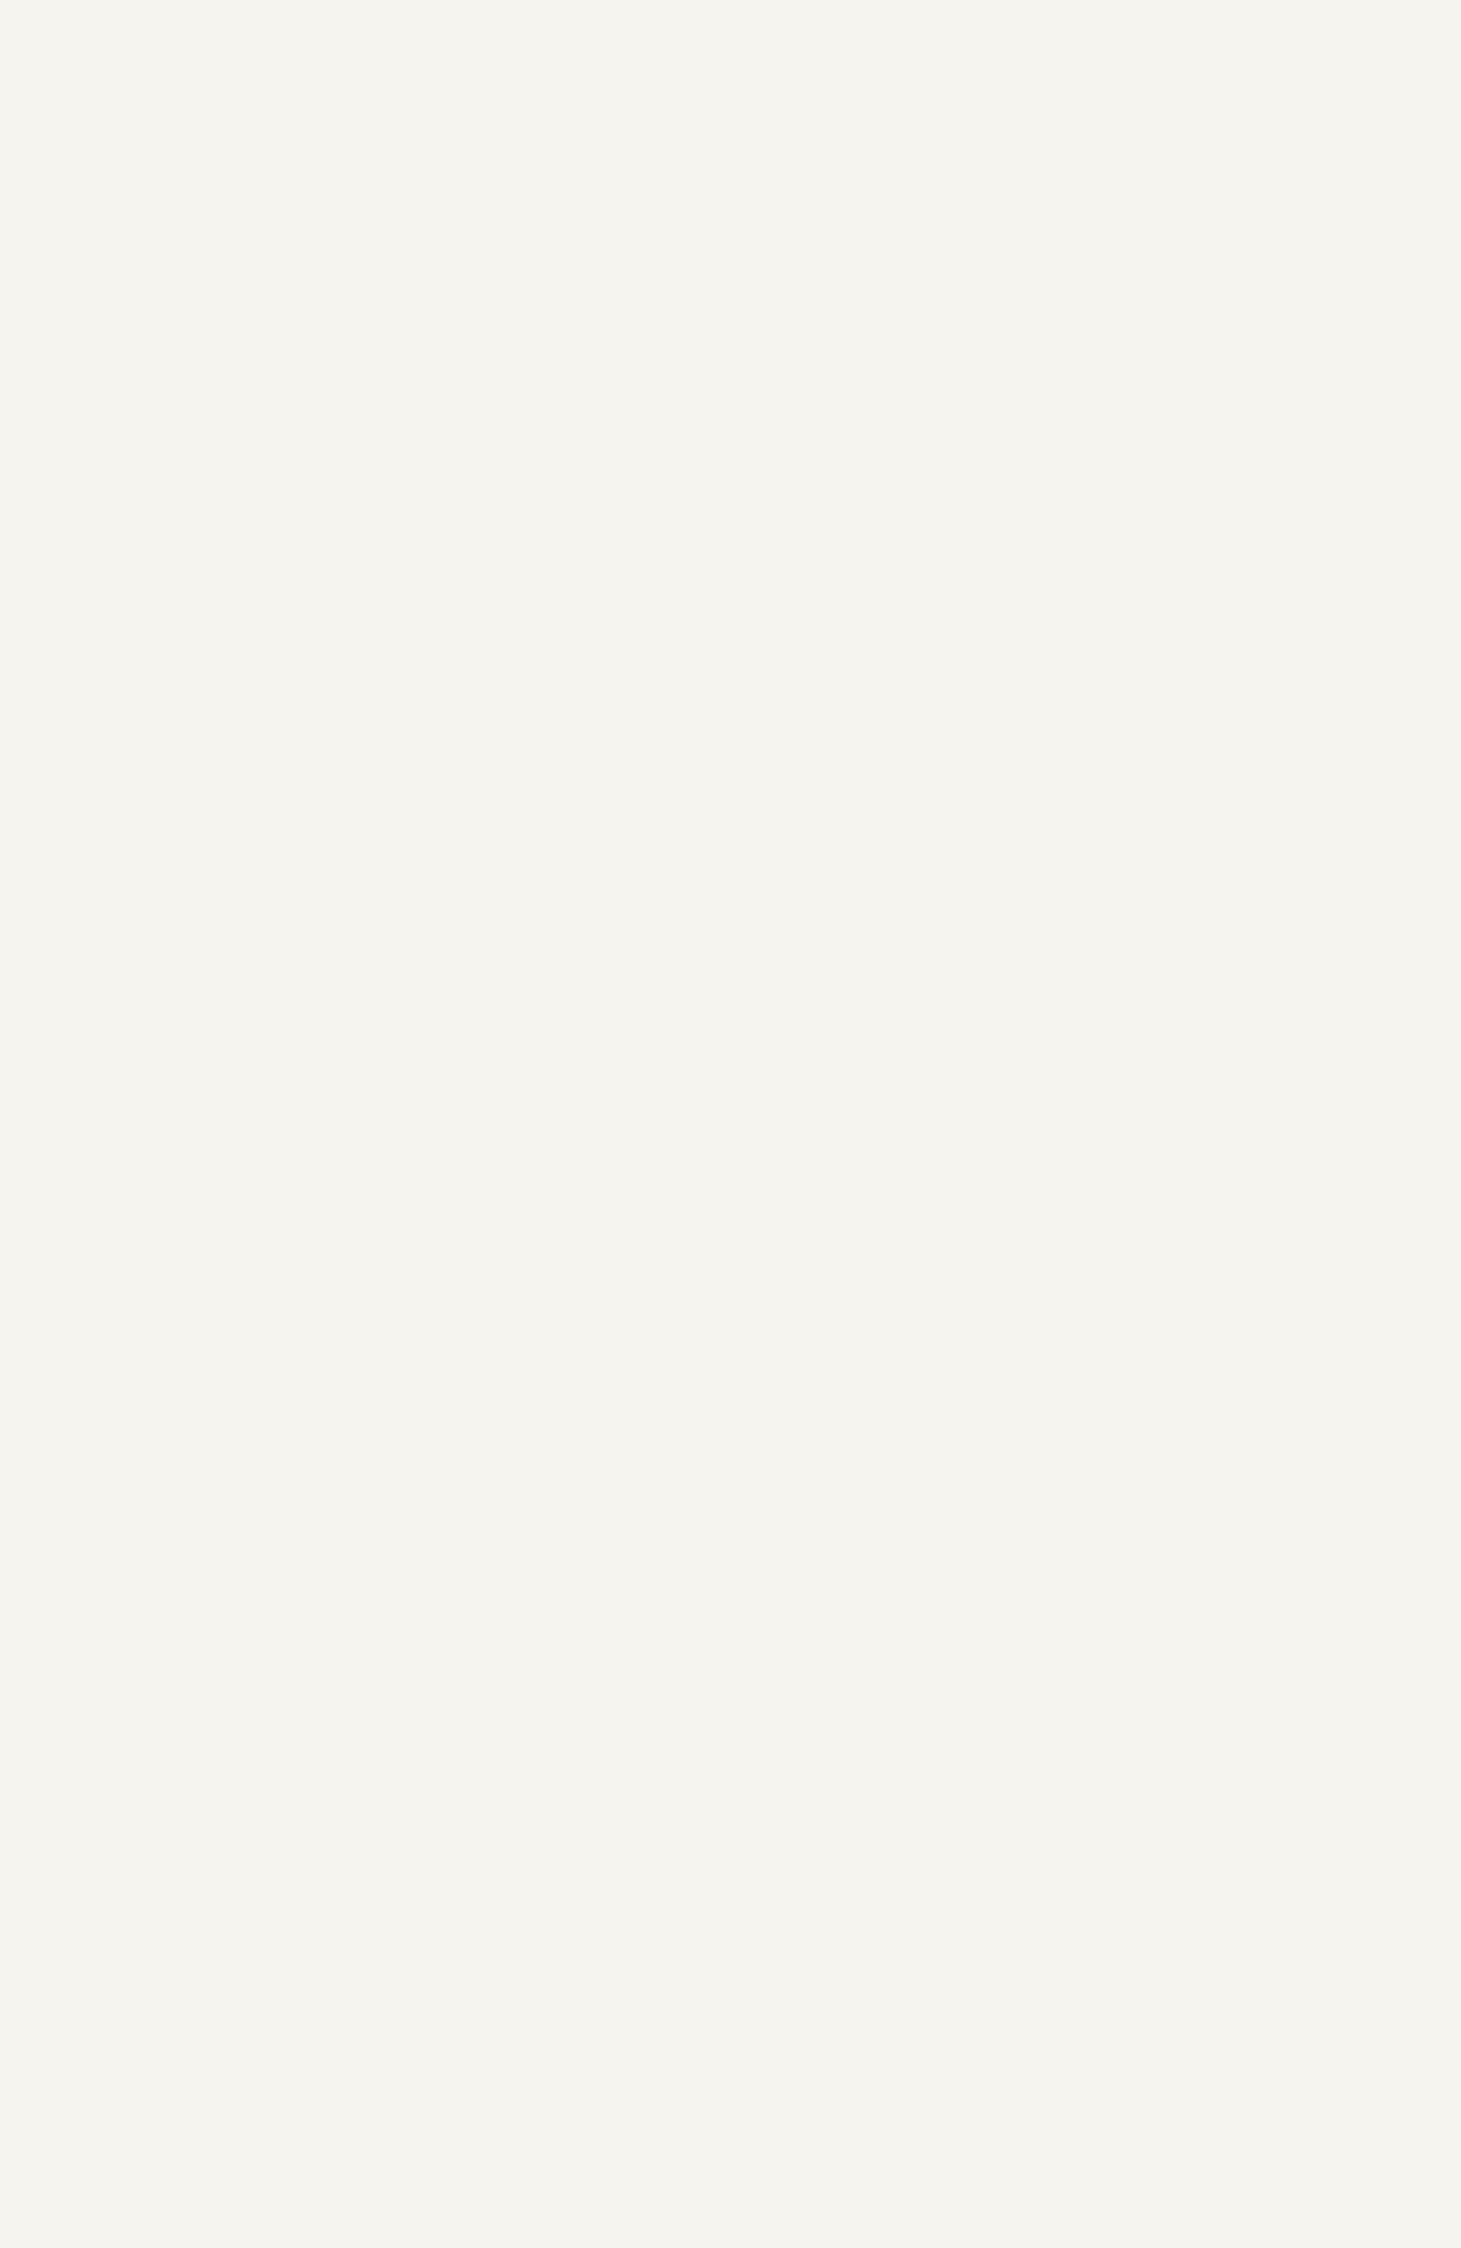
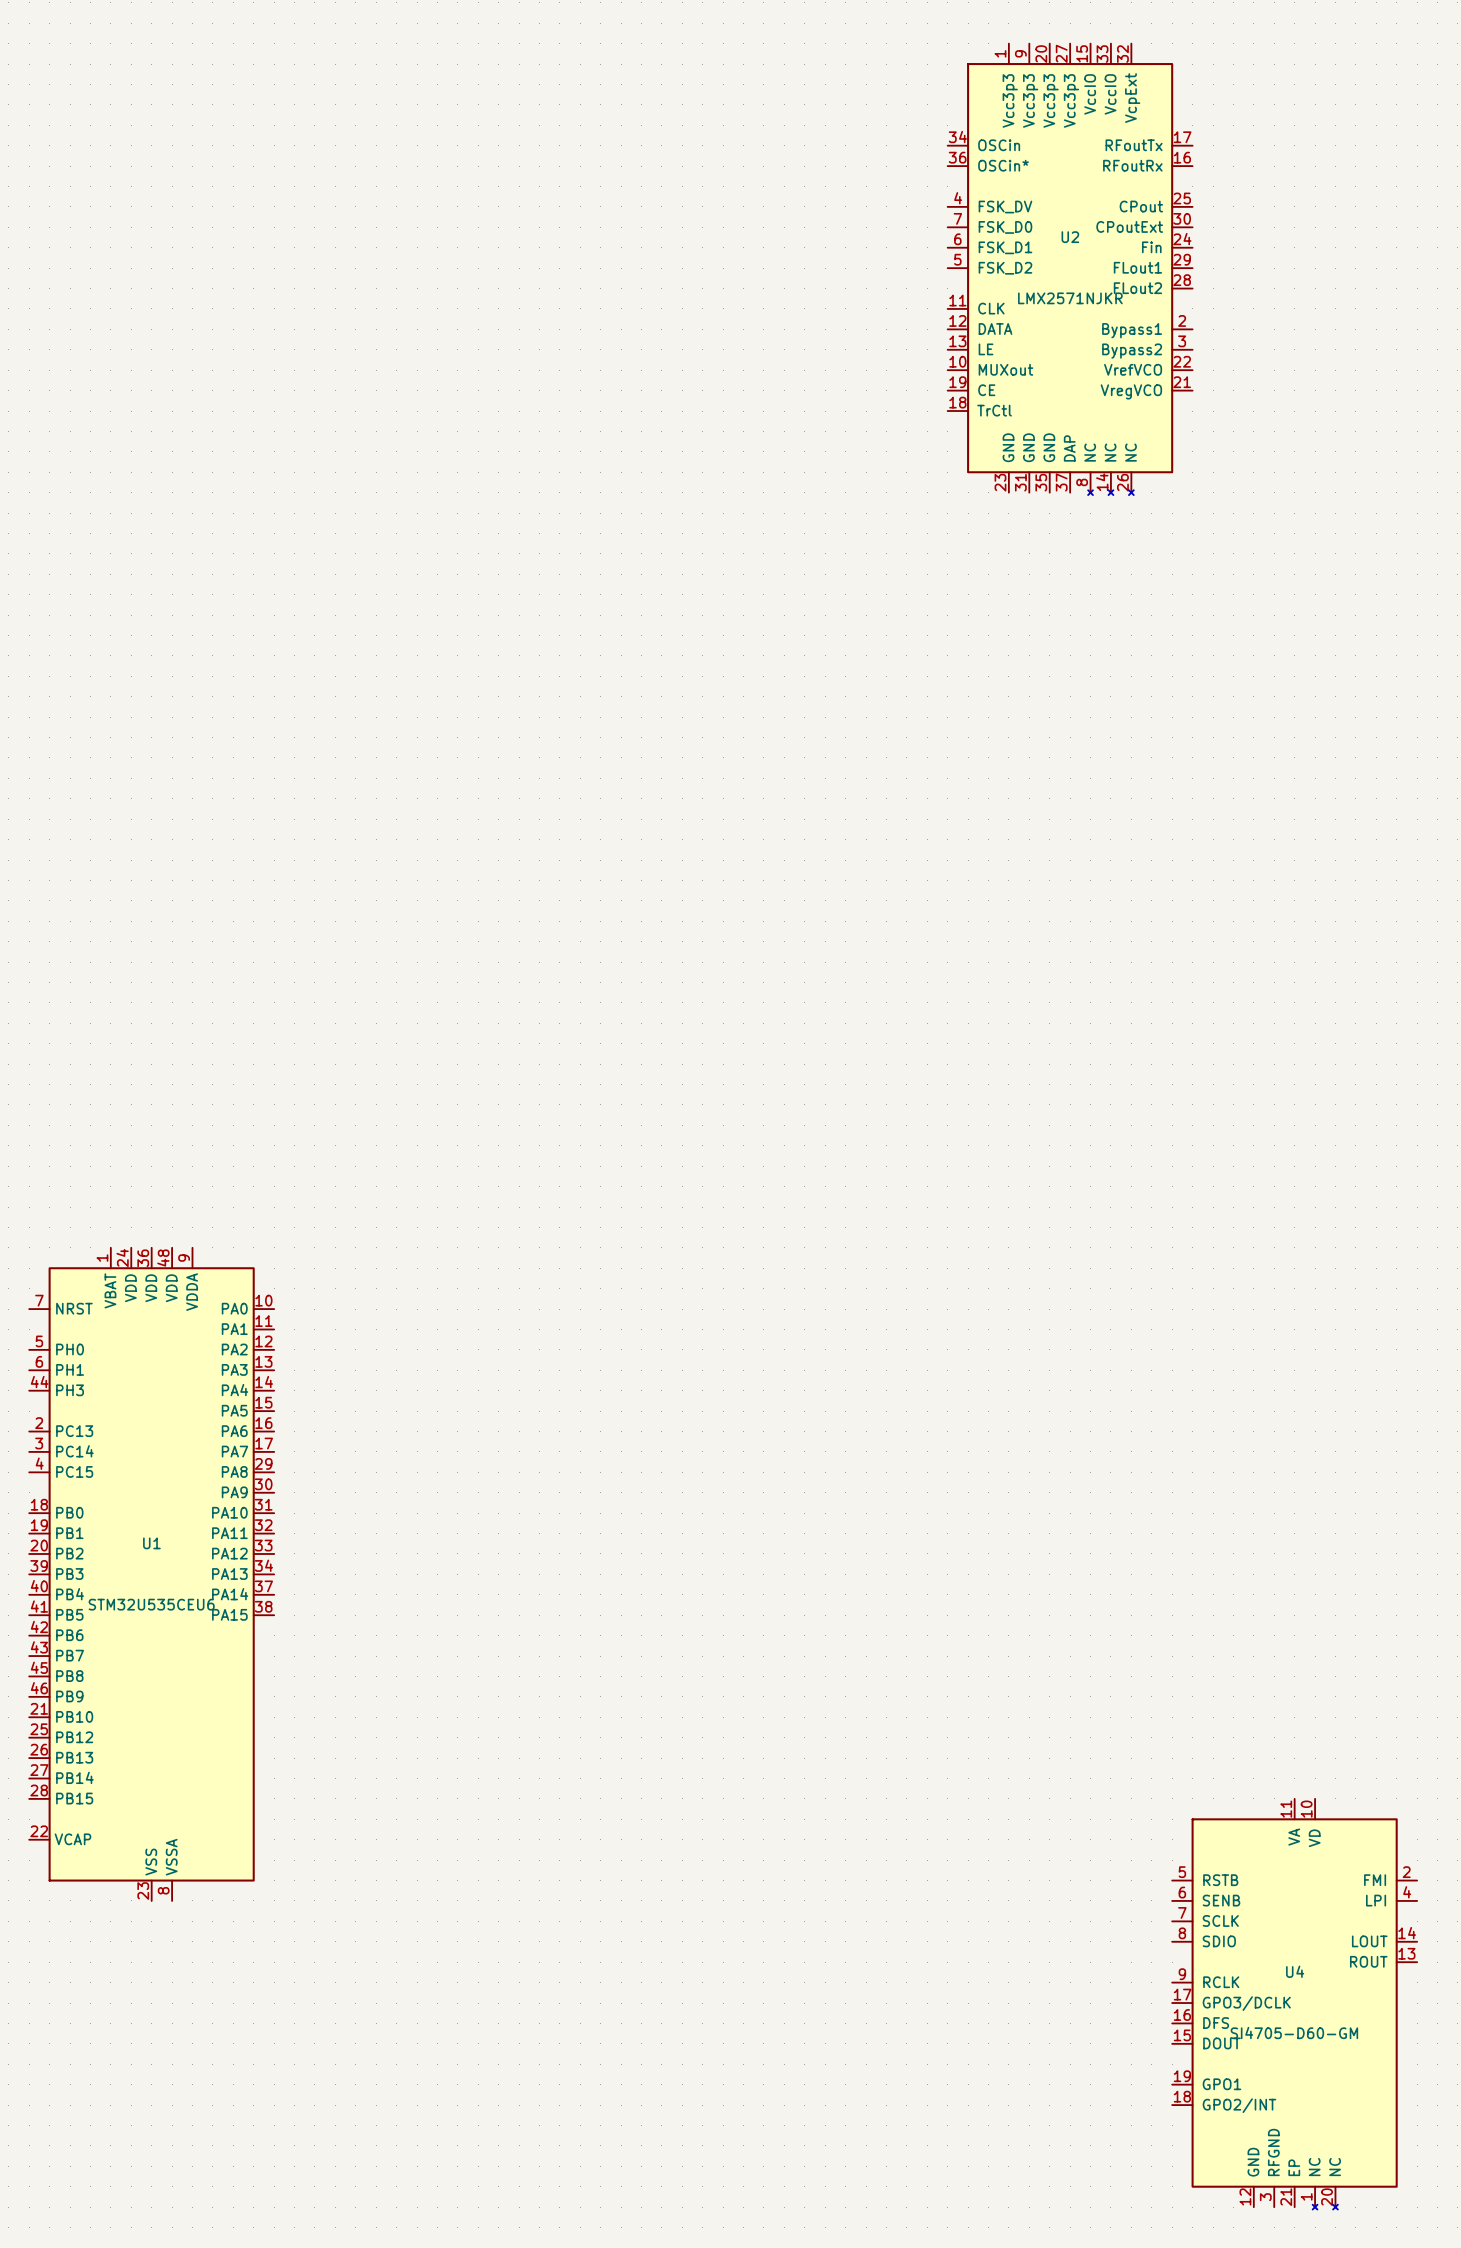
U2: none -> LMX2571NJKR (1070, 269)
U1: none -> STM32U535CEU6 (151, 1574)
U4: none -> SI4705-D60-GM (1294, 2004)

